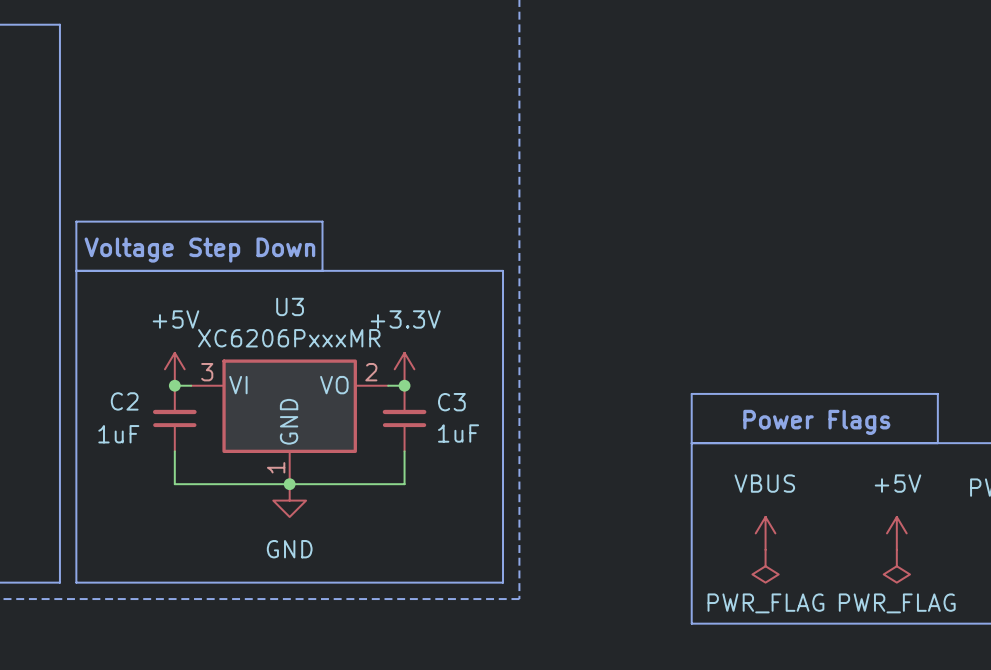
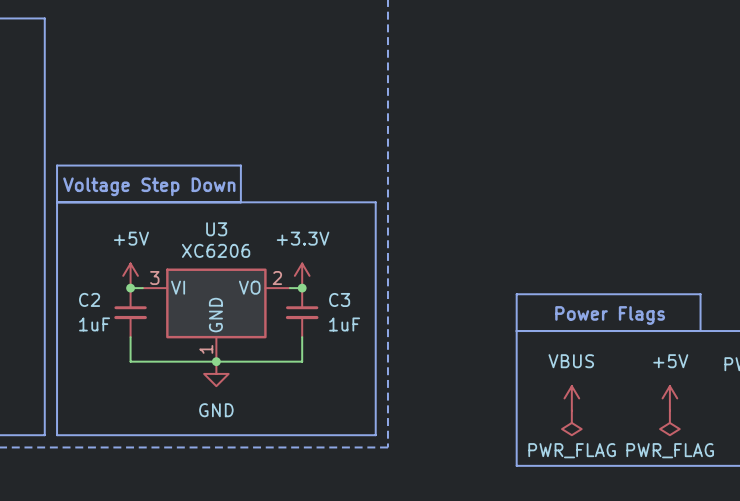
U3 value: XC6206PxxxMR (289, 338) -> XC6206 (216, 250)
C2 rotation: 0° (174, 418) -> 180° (130, 312)
C3 rotation: 0° (404, 418) -> 180° (302, 312)

